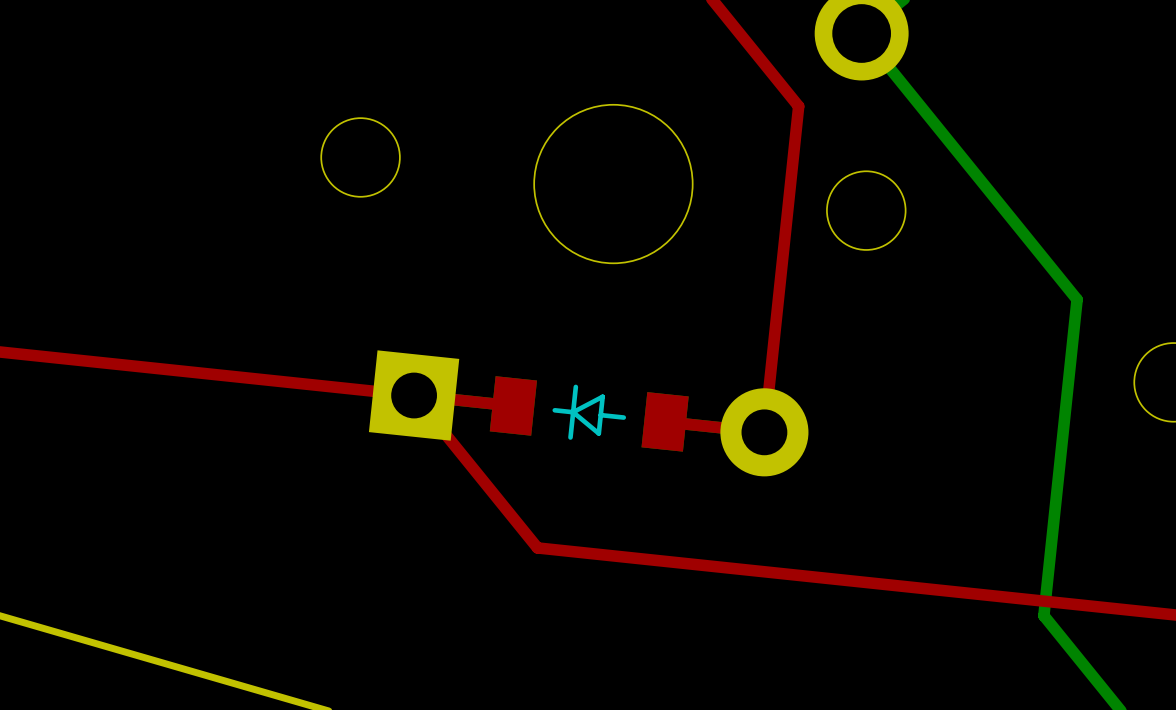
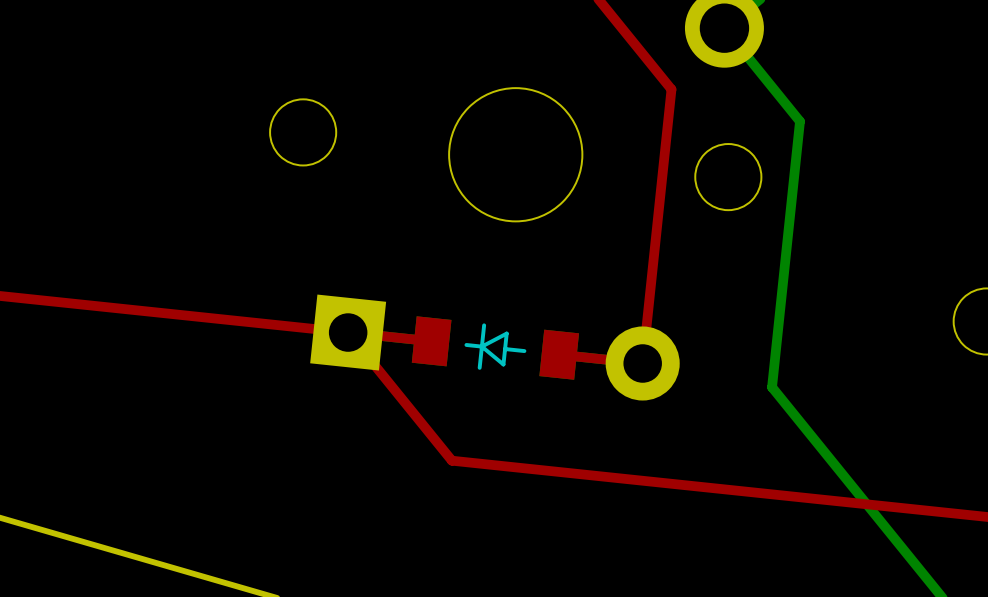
bottom track: (861, 33) (1077, 299) (1043, 615) -> (724, 28) (799, 121) (772, 387) (877, 517)

